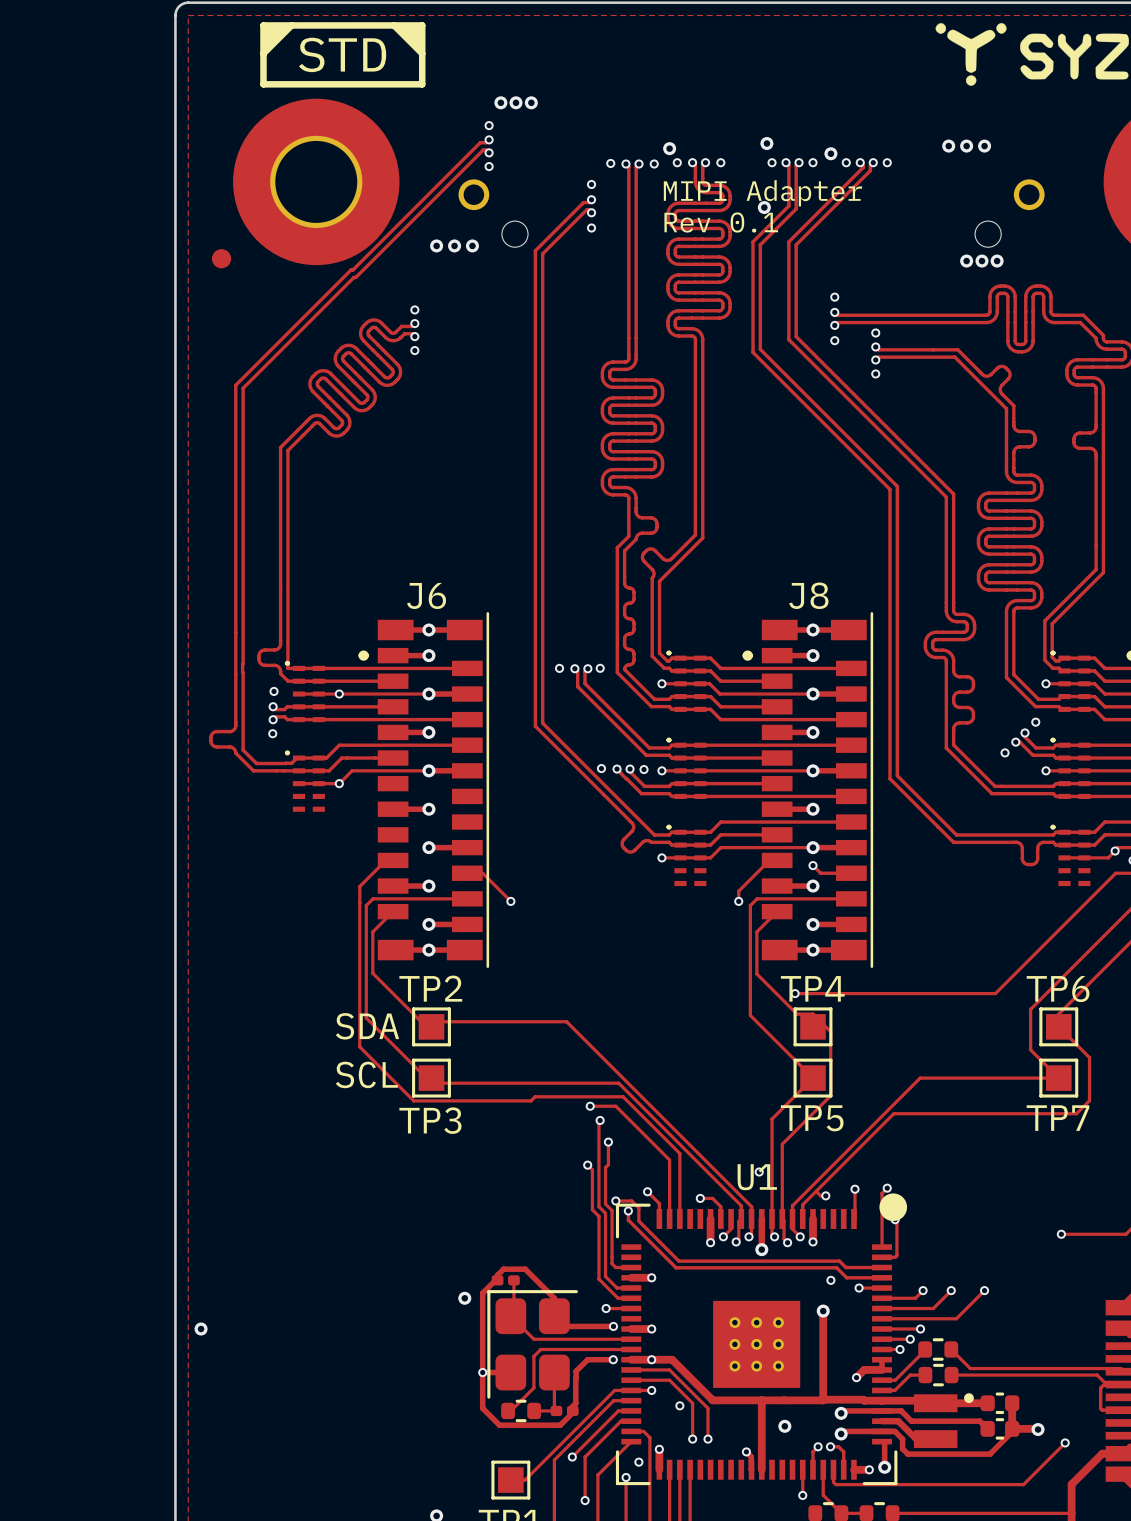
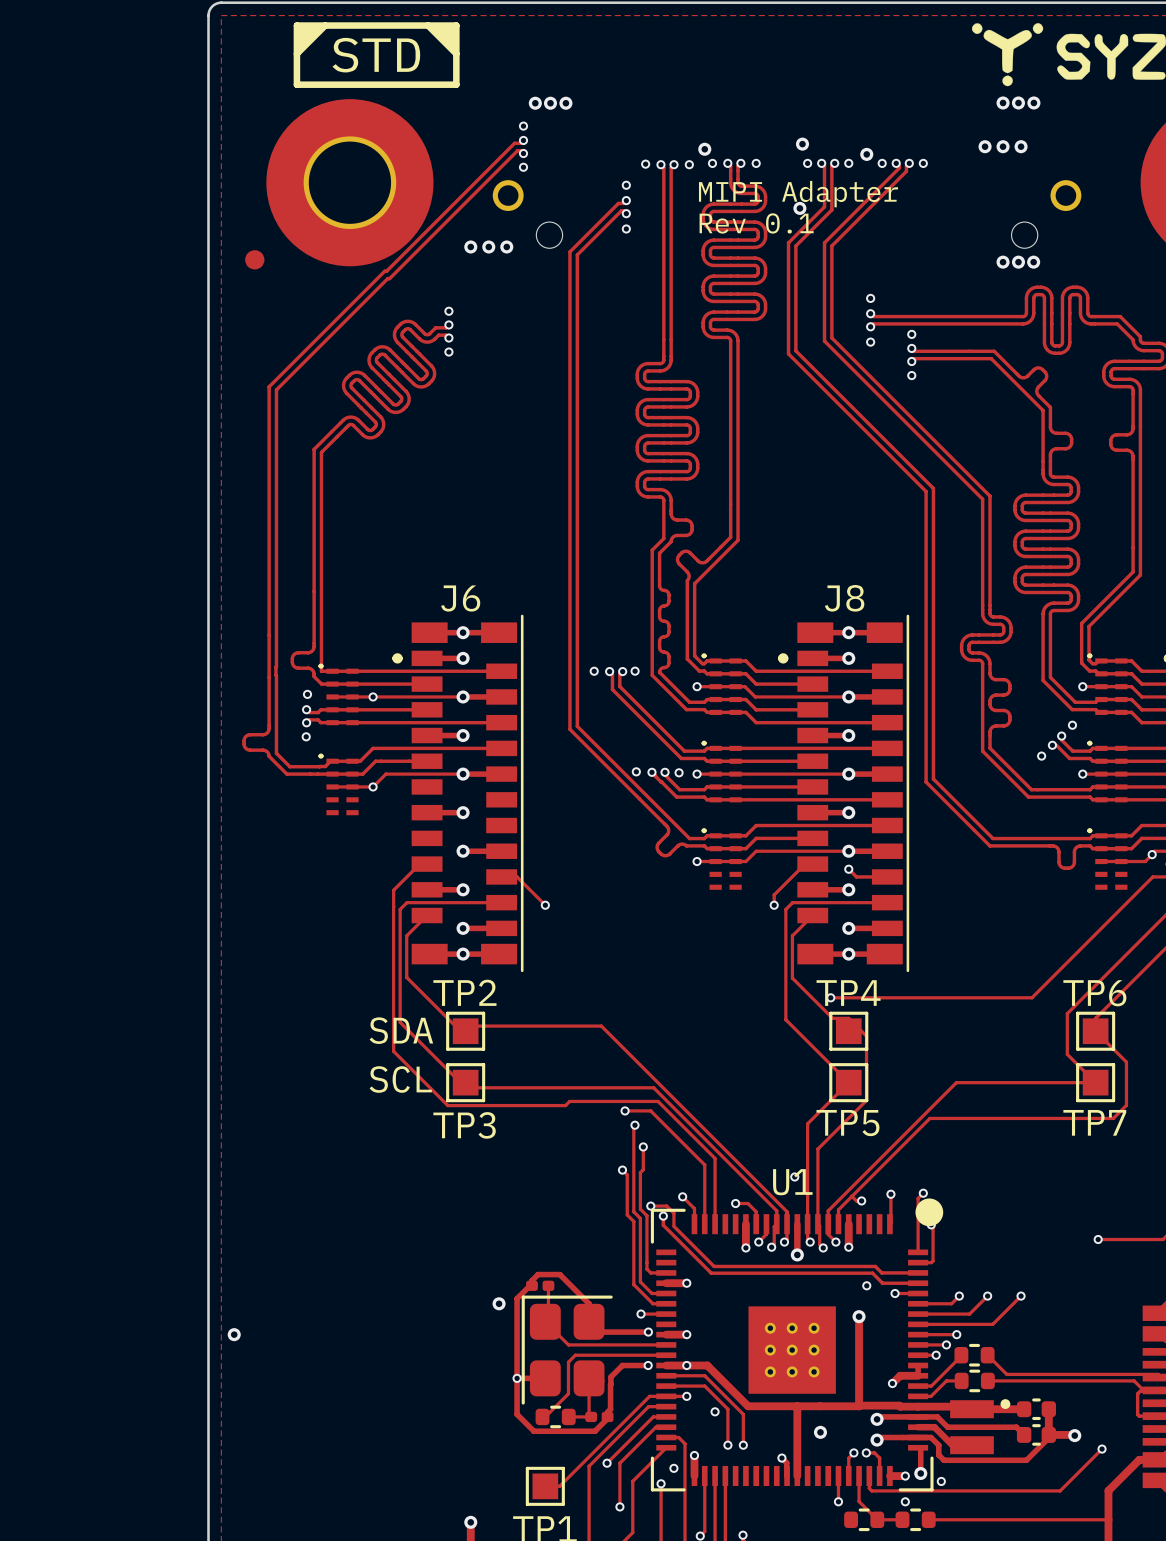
via: none -> (1003, 102)
via: none -> (1018, 102)
via: none -> (1033, 102)
via: none -> (941, 1481)
via: none -> (905, 1501)

